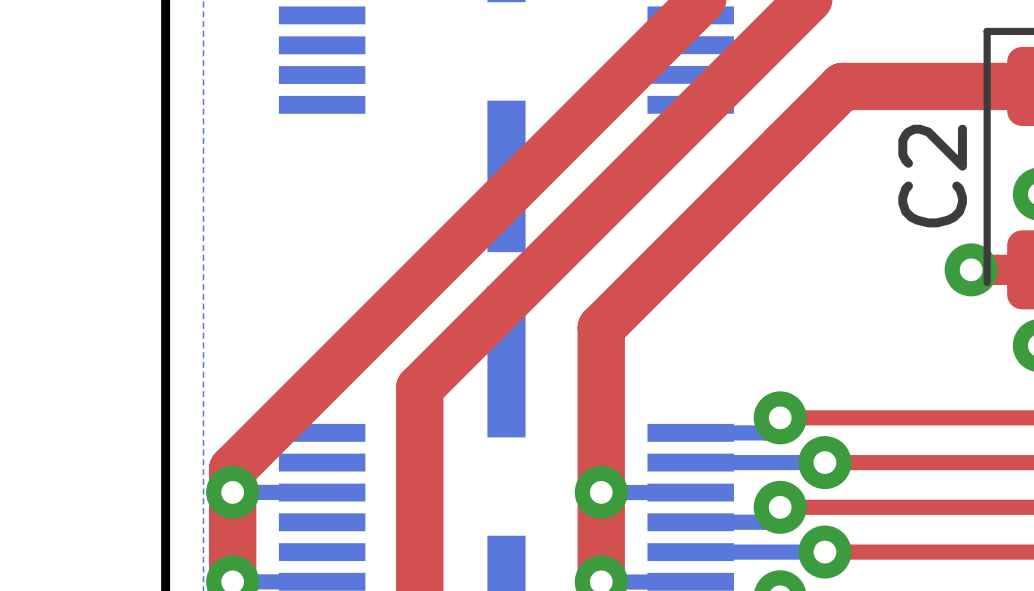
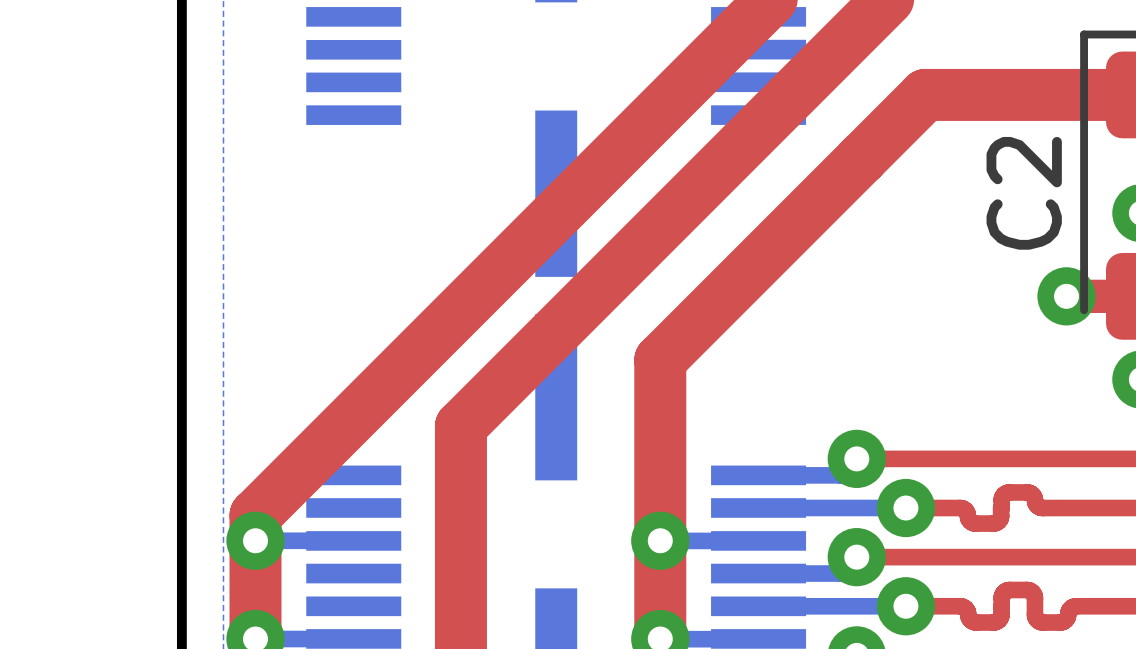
top track: (874, 462) (949, 462) -> (960, 508) (966, 510) (969, 520) (975, 523) (996, 522) (1000, 517) (1001, 508)
top track: none -> (1001, 508) (1002, 496) (1009, 492) (1030, 493) (1034, 496) (1036, 505) (1042, 508)
top track: (874, 552) (980, 552) -> (1001, 606) (1002, 594) (1009, 590) (1028, 590) (1033, 593) (1035, 616) (1041, 622) (1063, 621) (1067, 617) (1070, 609) (1076, 606)
top track: none -> (960, 606) (966, 609) (970, 619) (976, 622) (998, 620) (1001, 616) (1001, 606)

